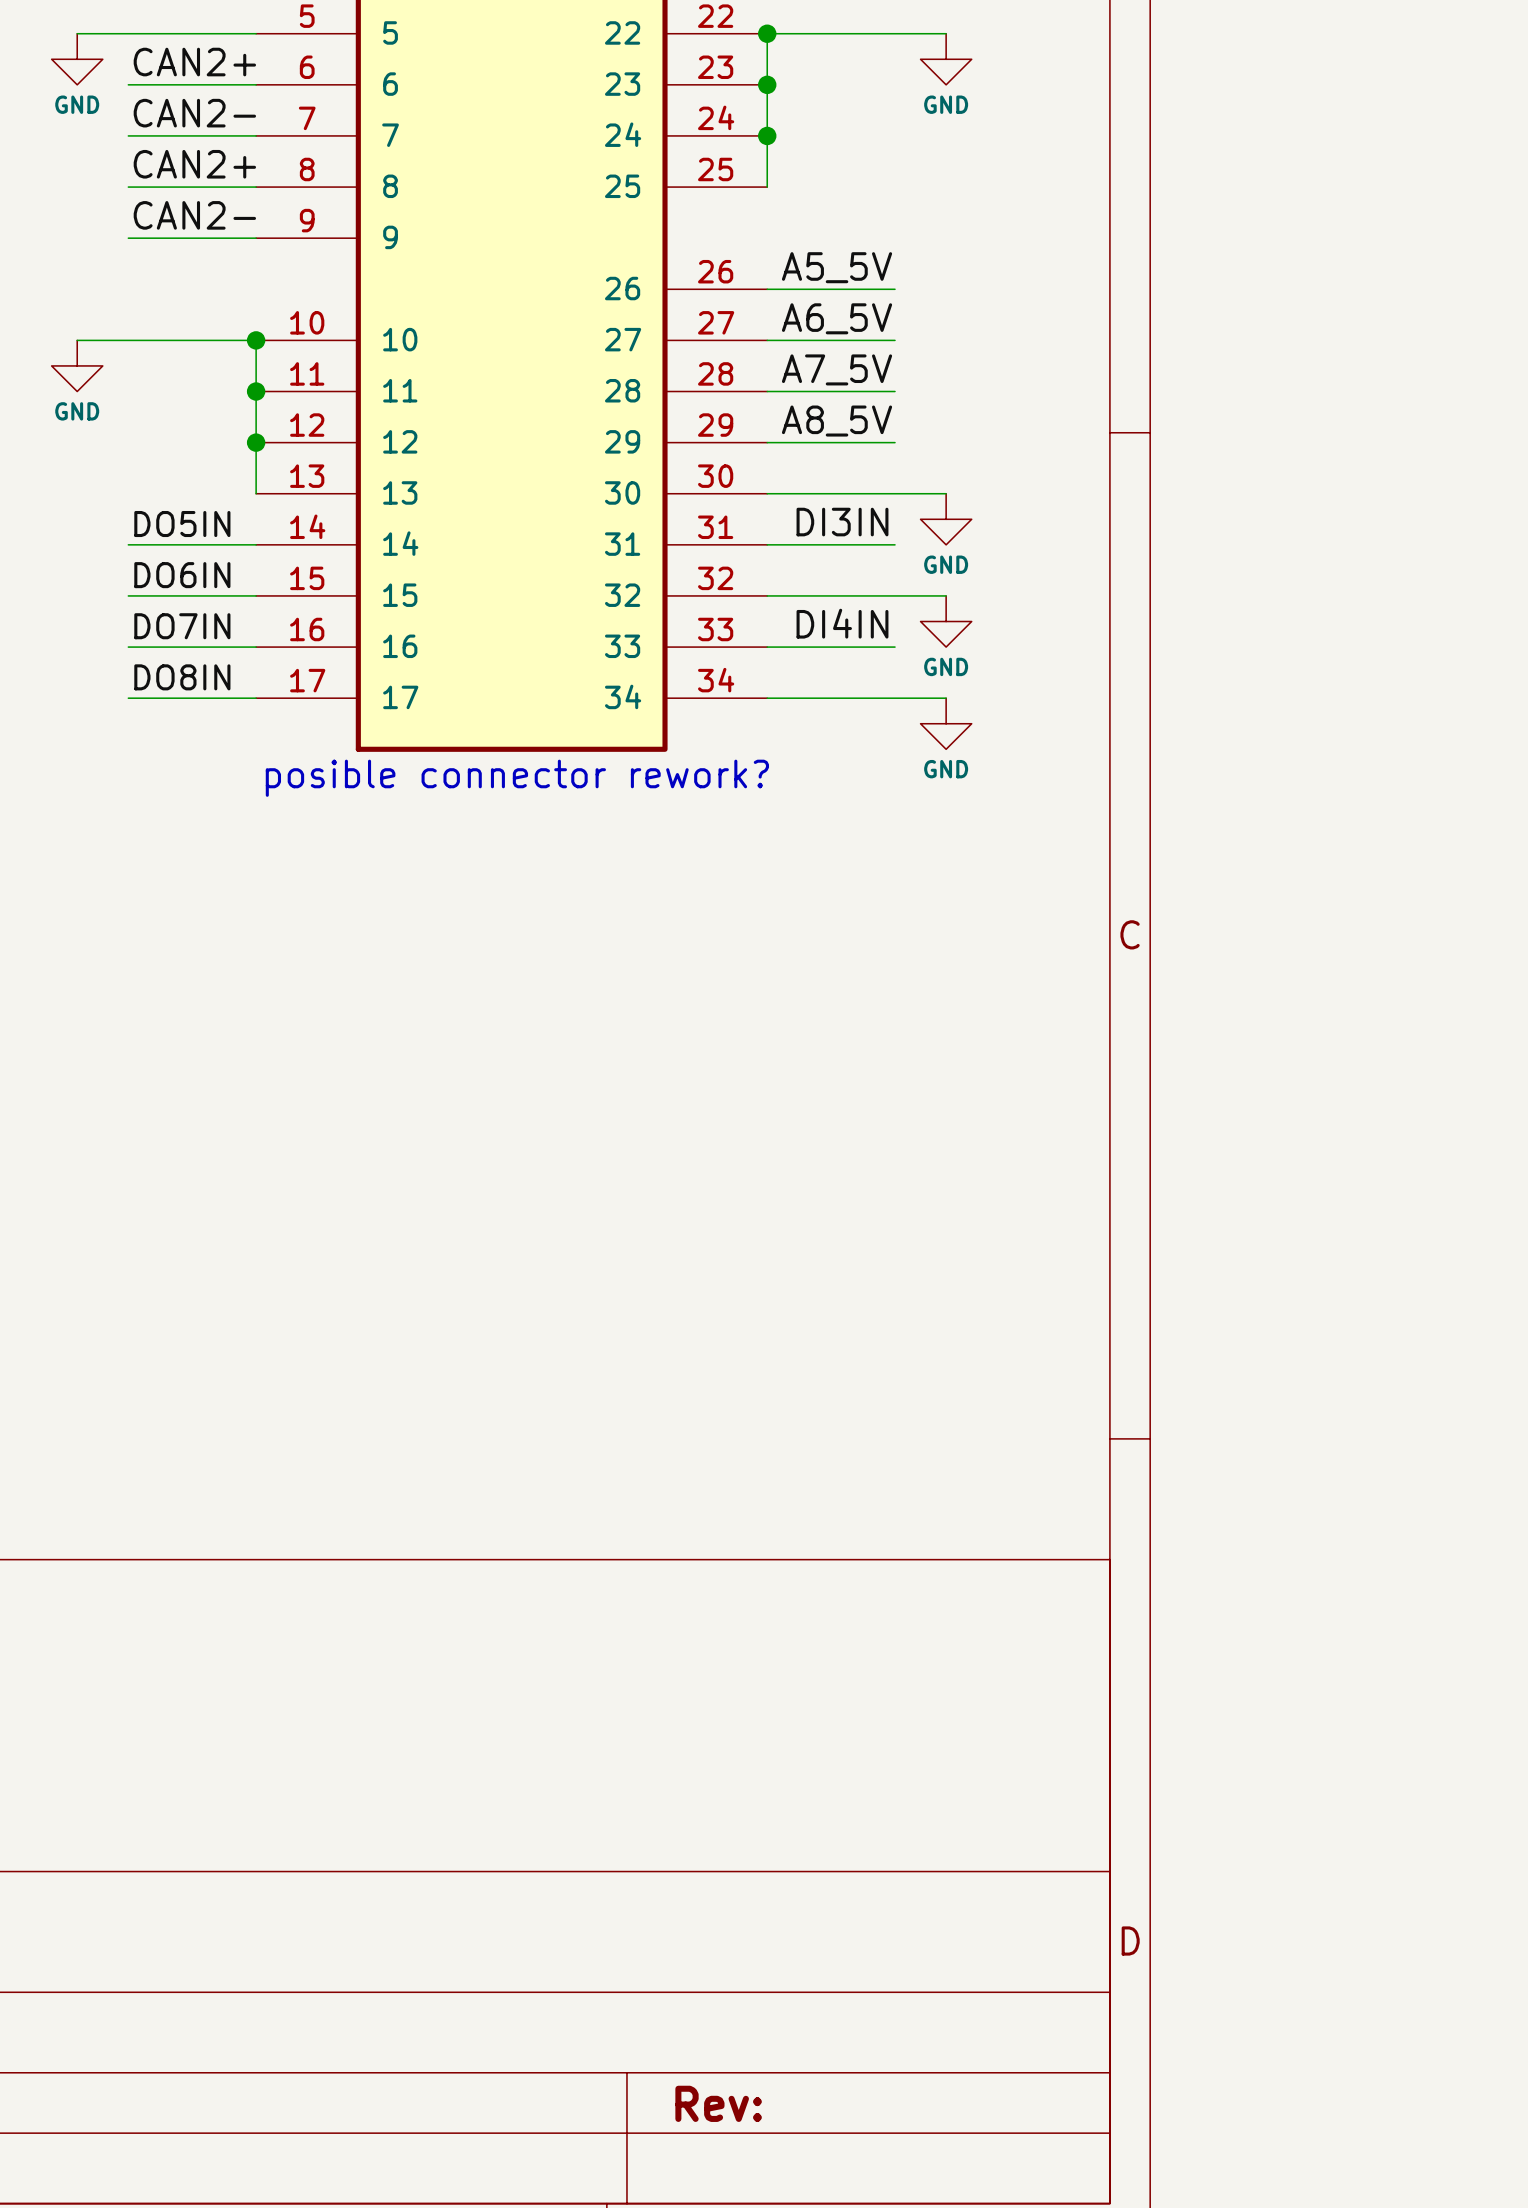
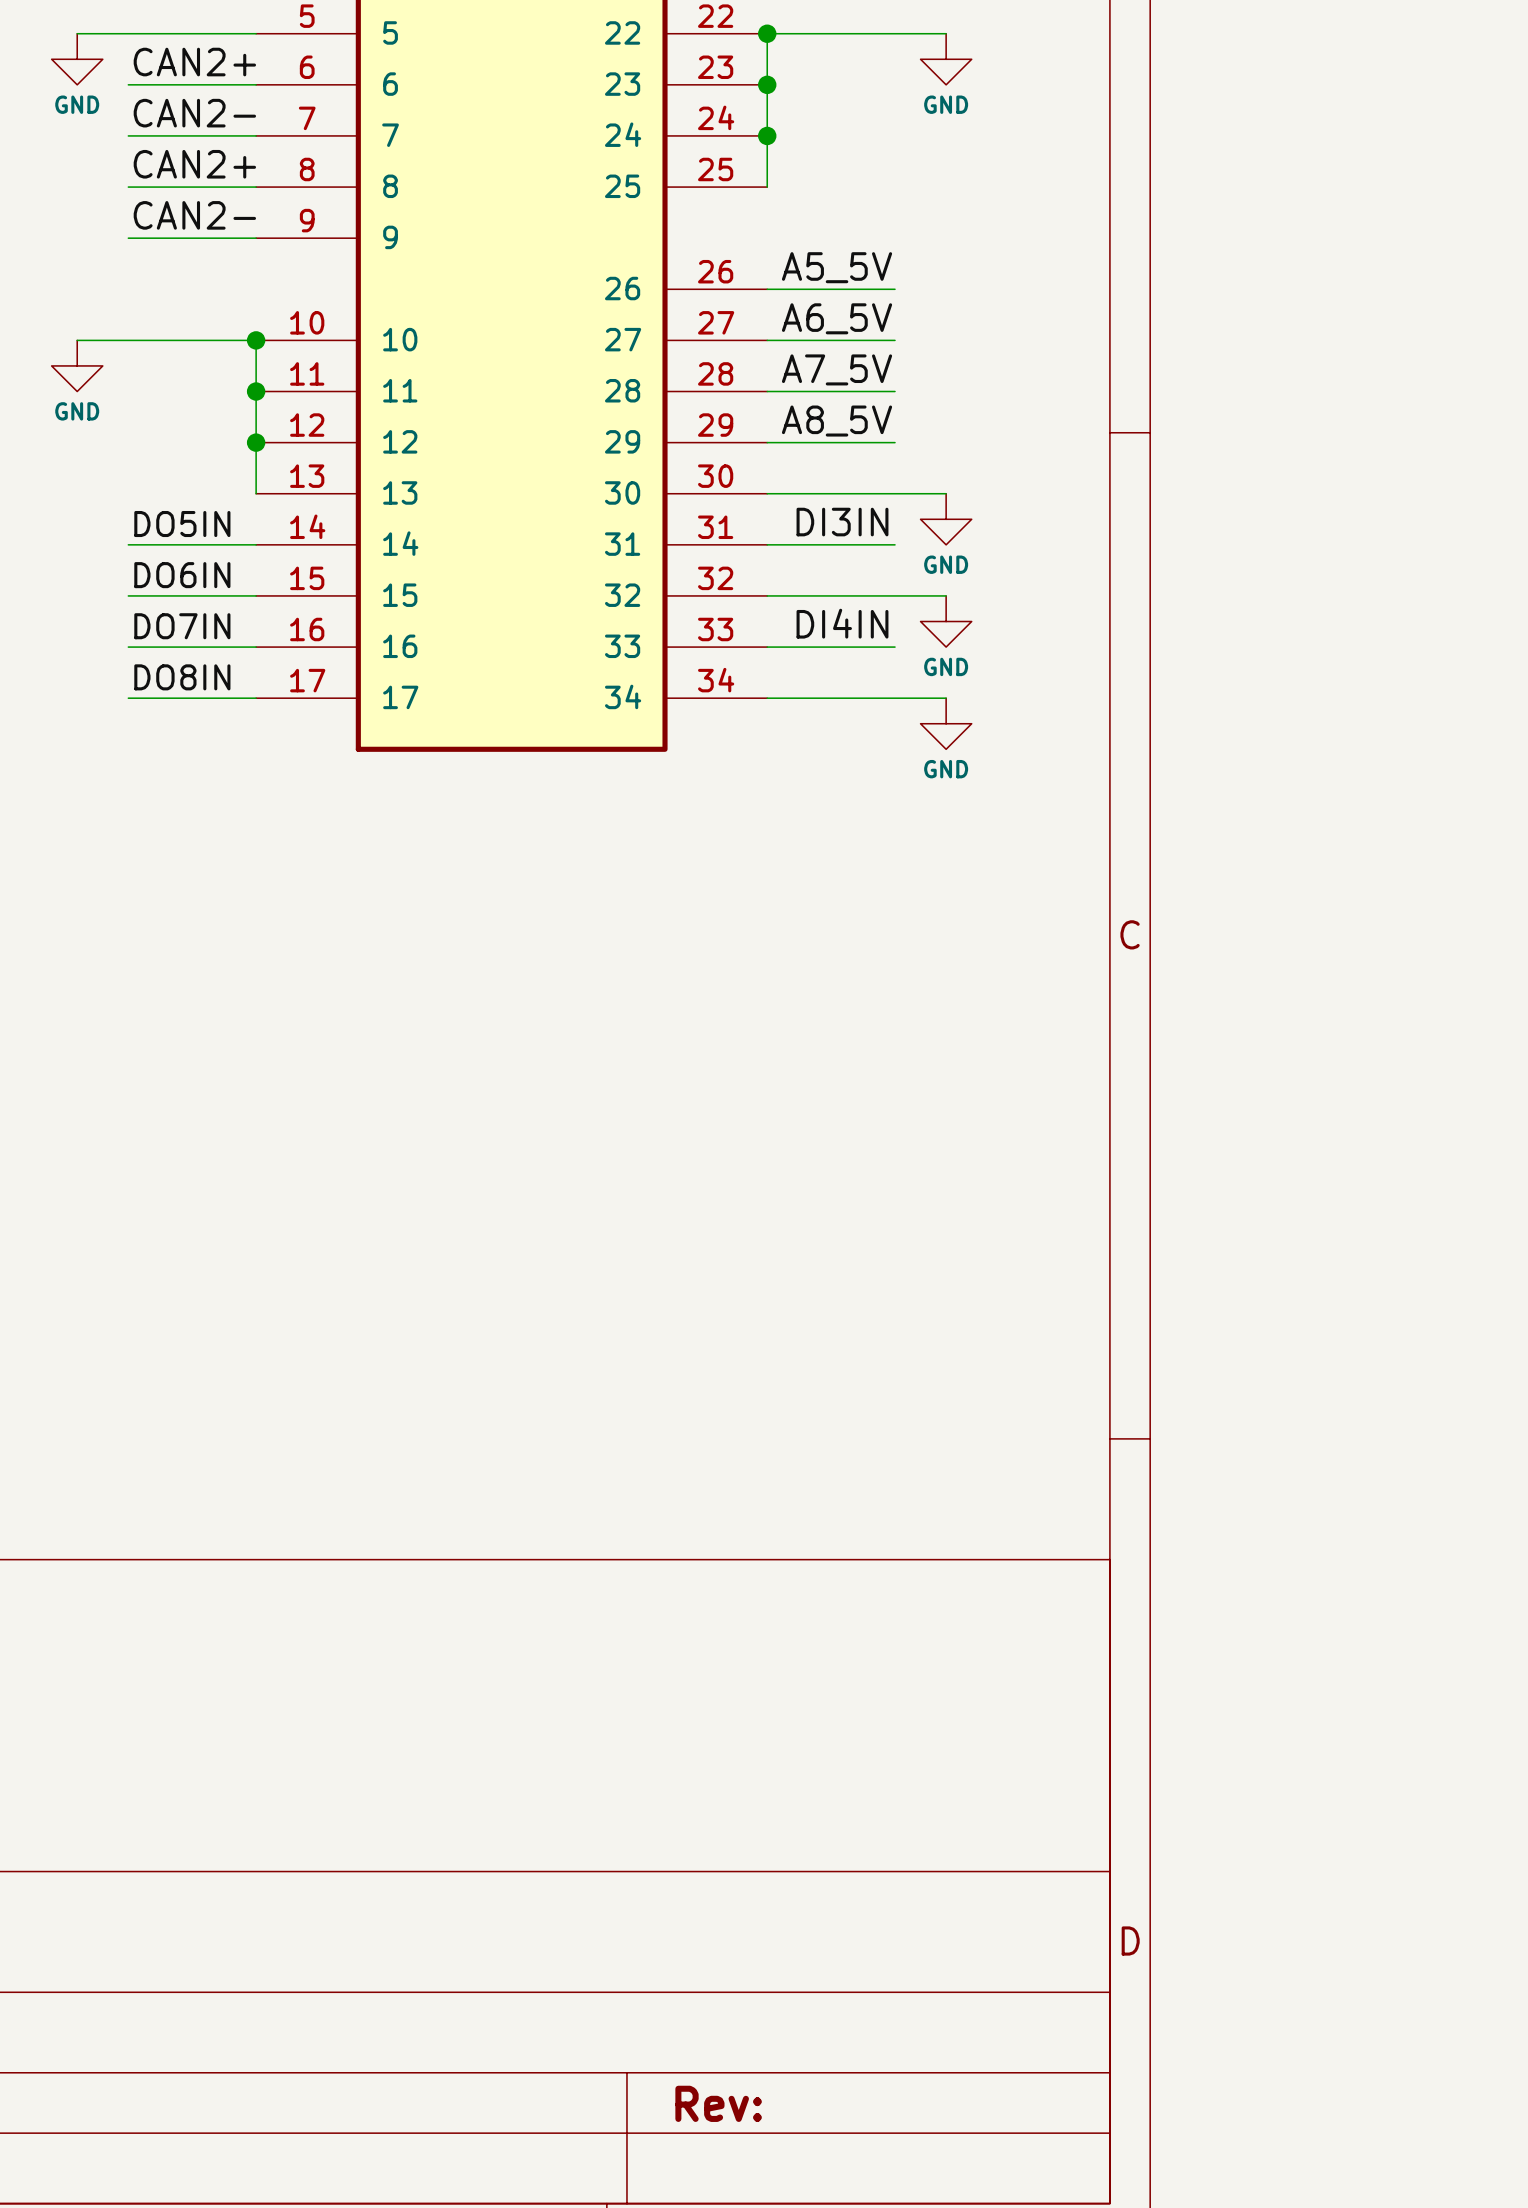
text: posible connector rework? (517, 778) -> none

